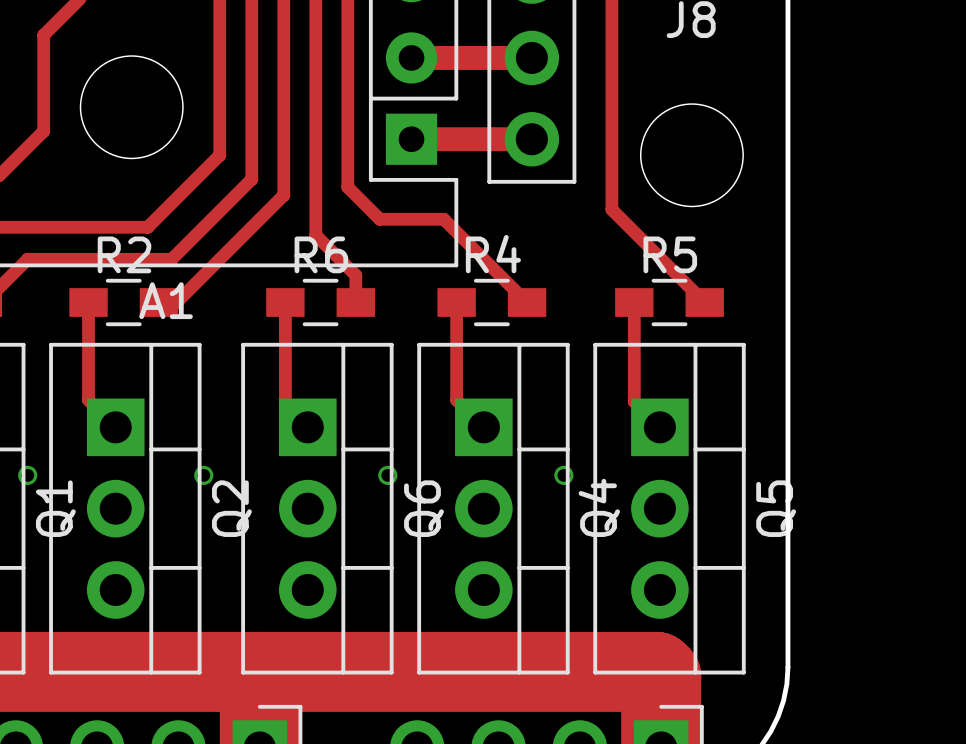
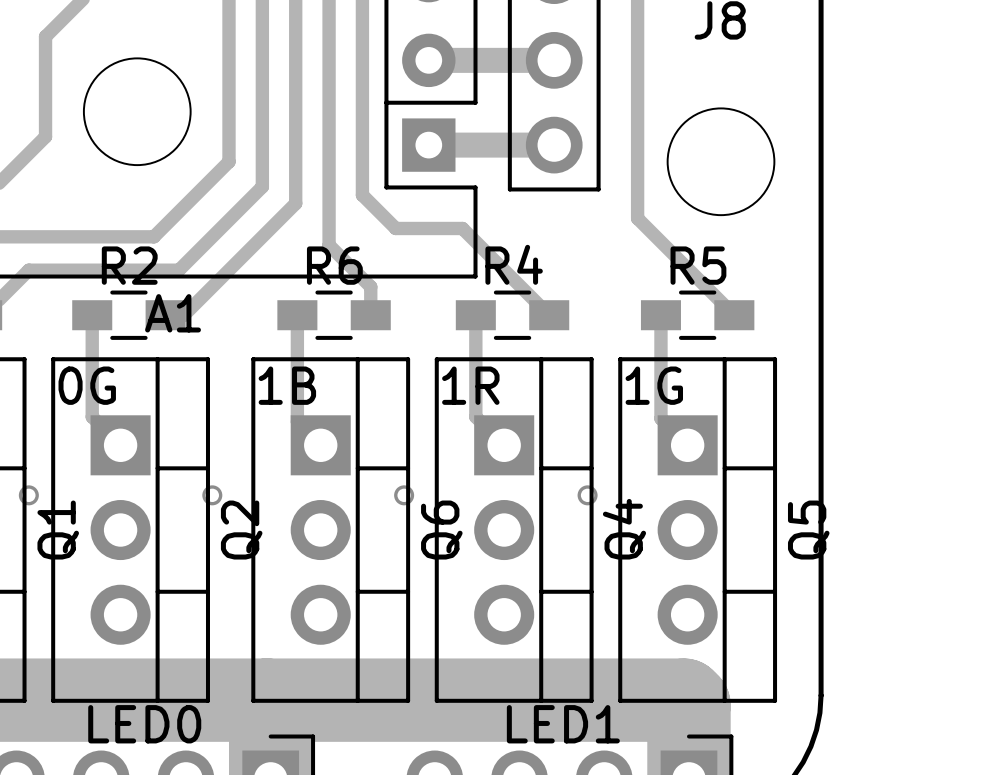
text: none -> 0G (87, 385)
text: none -> 1B (287, 385)
text: none -> 1R (470, 385)
text: none -> 1G (654, 385)
part value: none -> LED0 (144, 724)
part value: none -> LED1 (563, 724)

